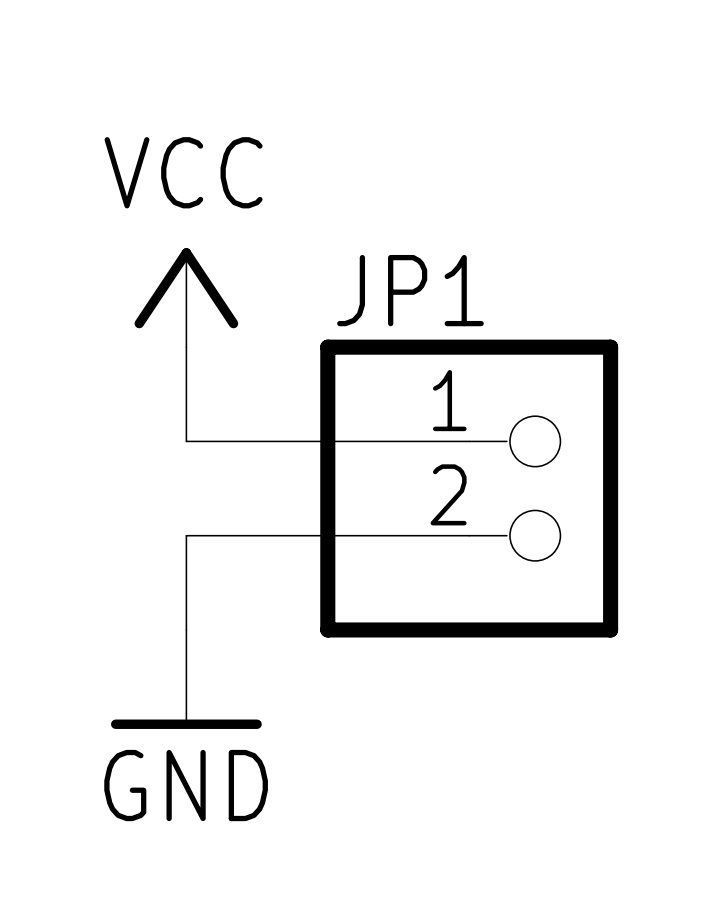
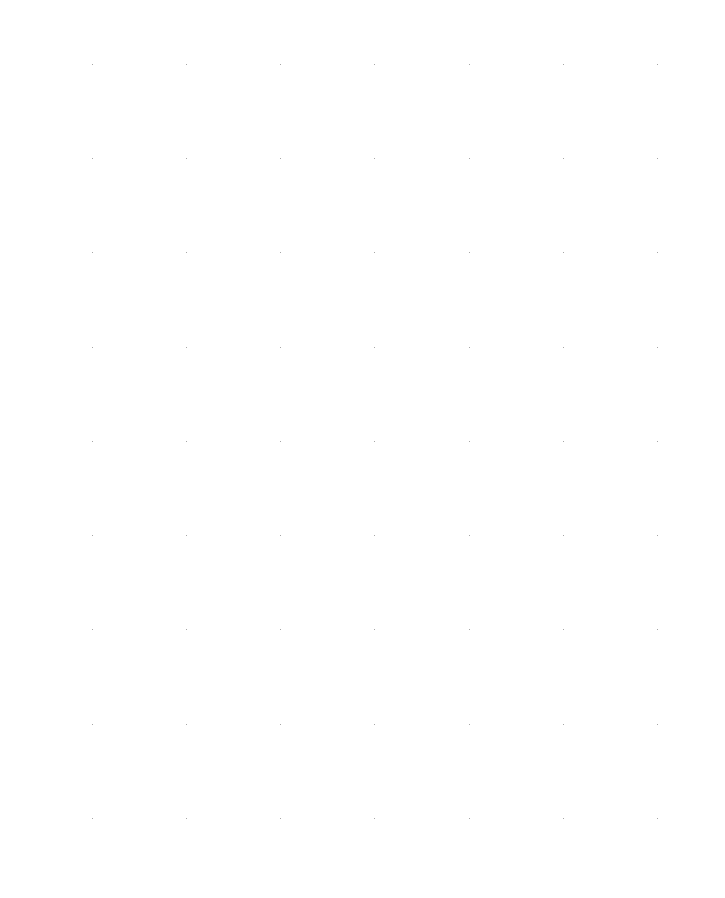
power symbol: VCC (186, 297) -> none
wire: (186, 347) (186, 441) (469, 441) -> none
JP1: (469, 488) -> none
wire: (469, 535) (186, 535) (186, 629) -> none
power symbol: GND (186, 679) -> none

